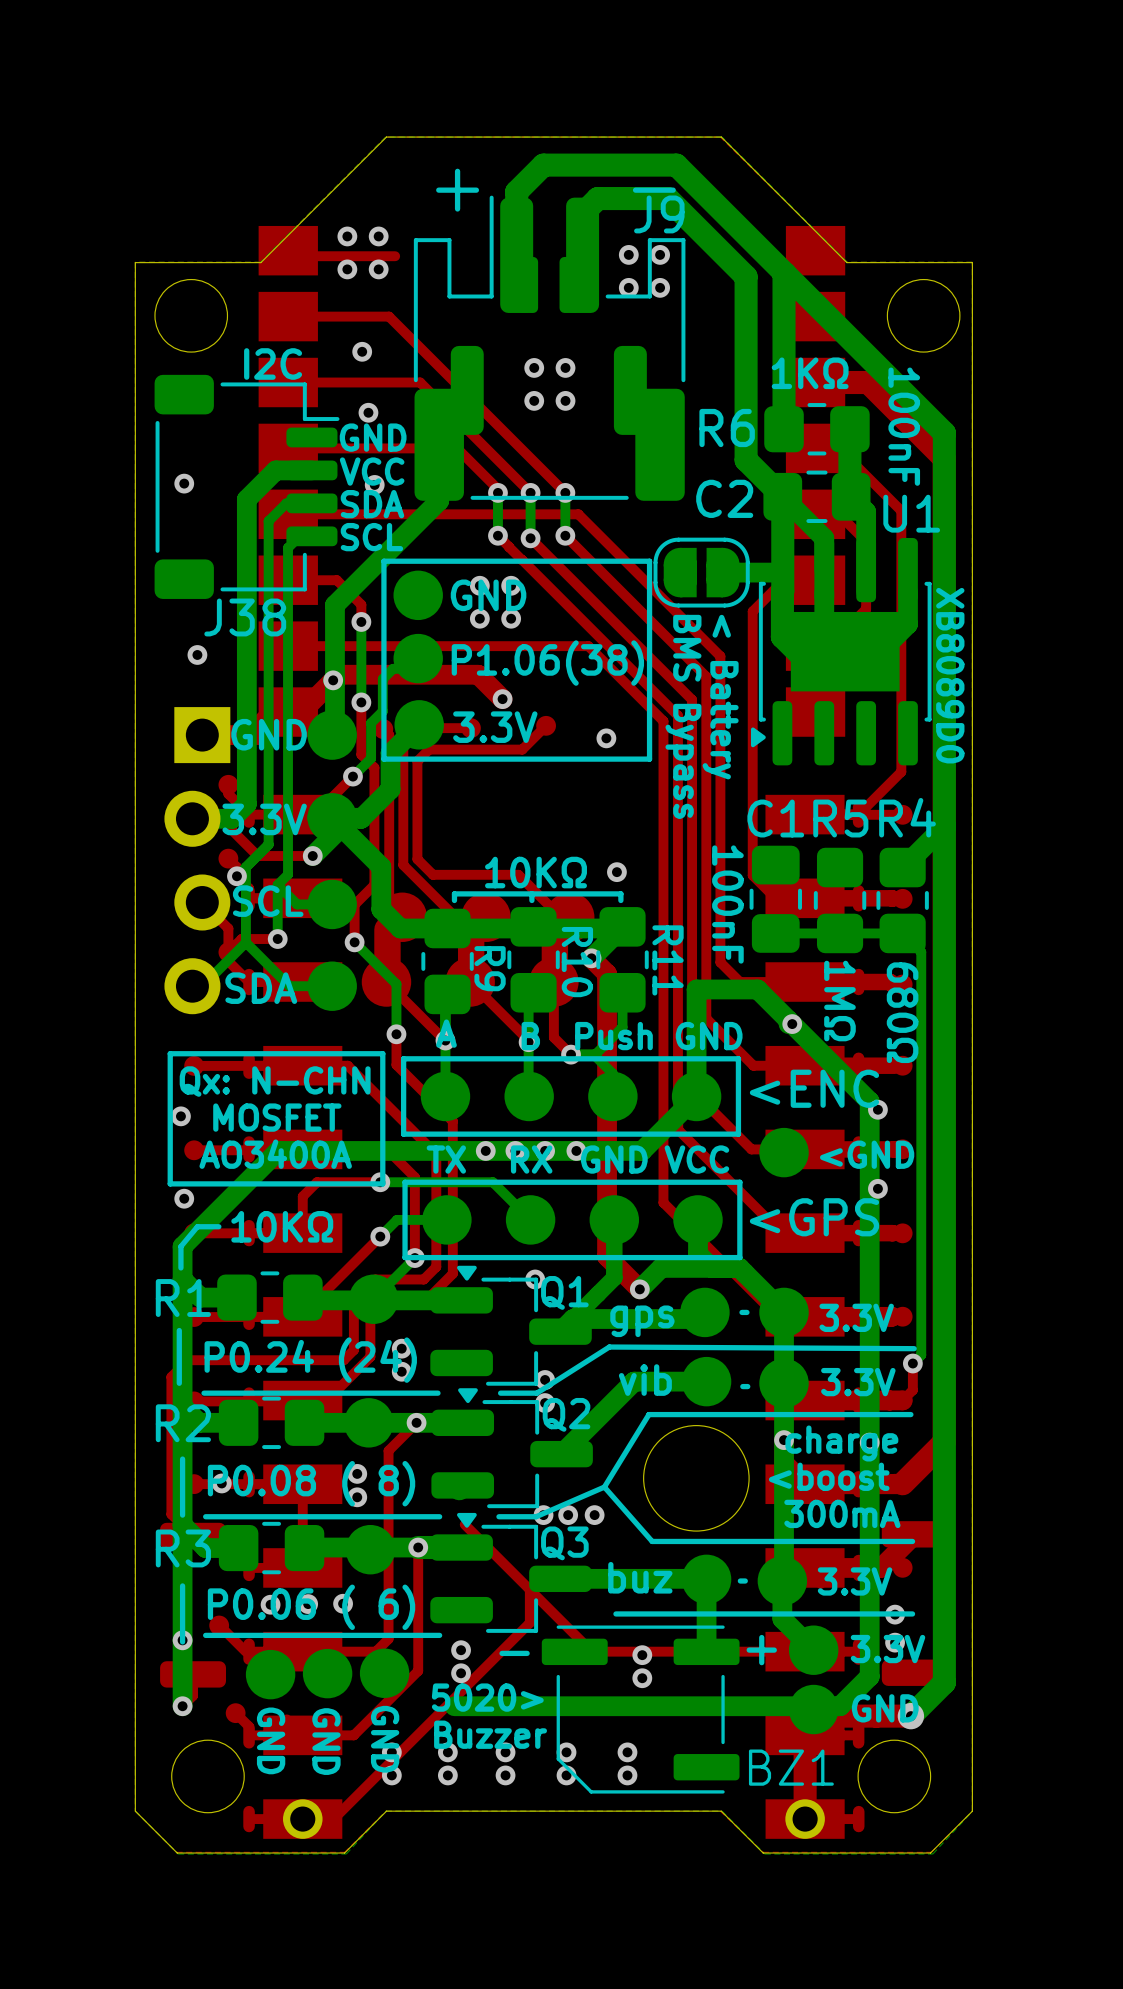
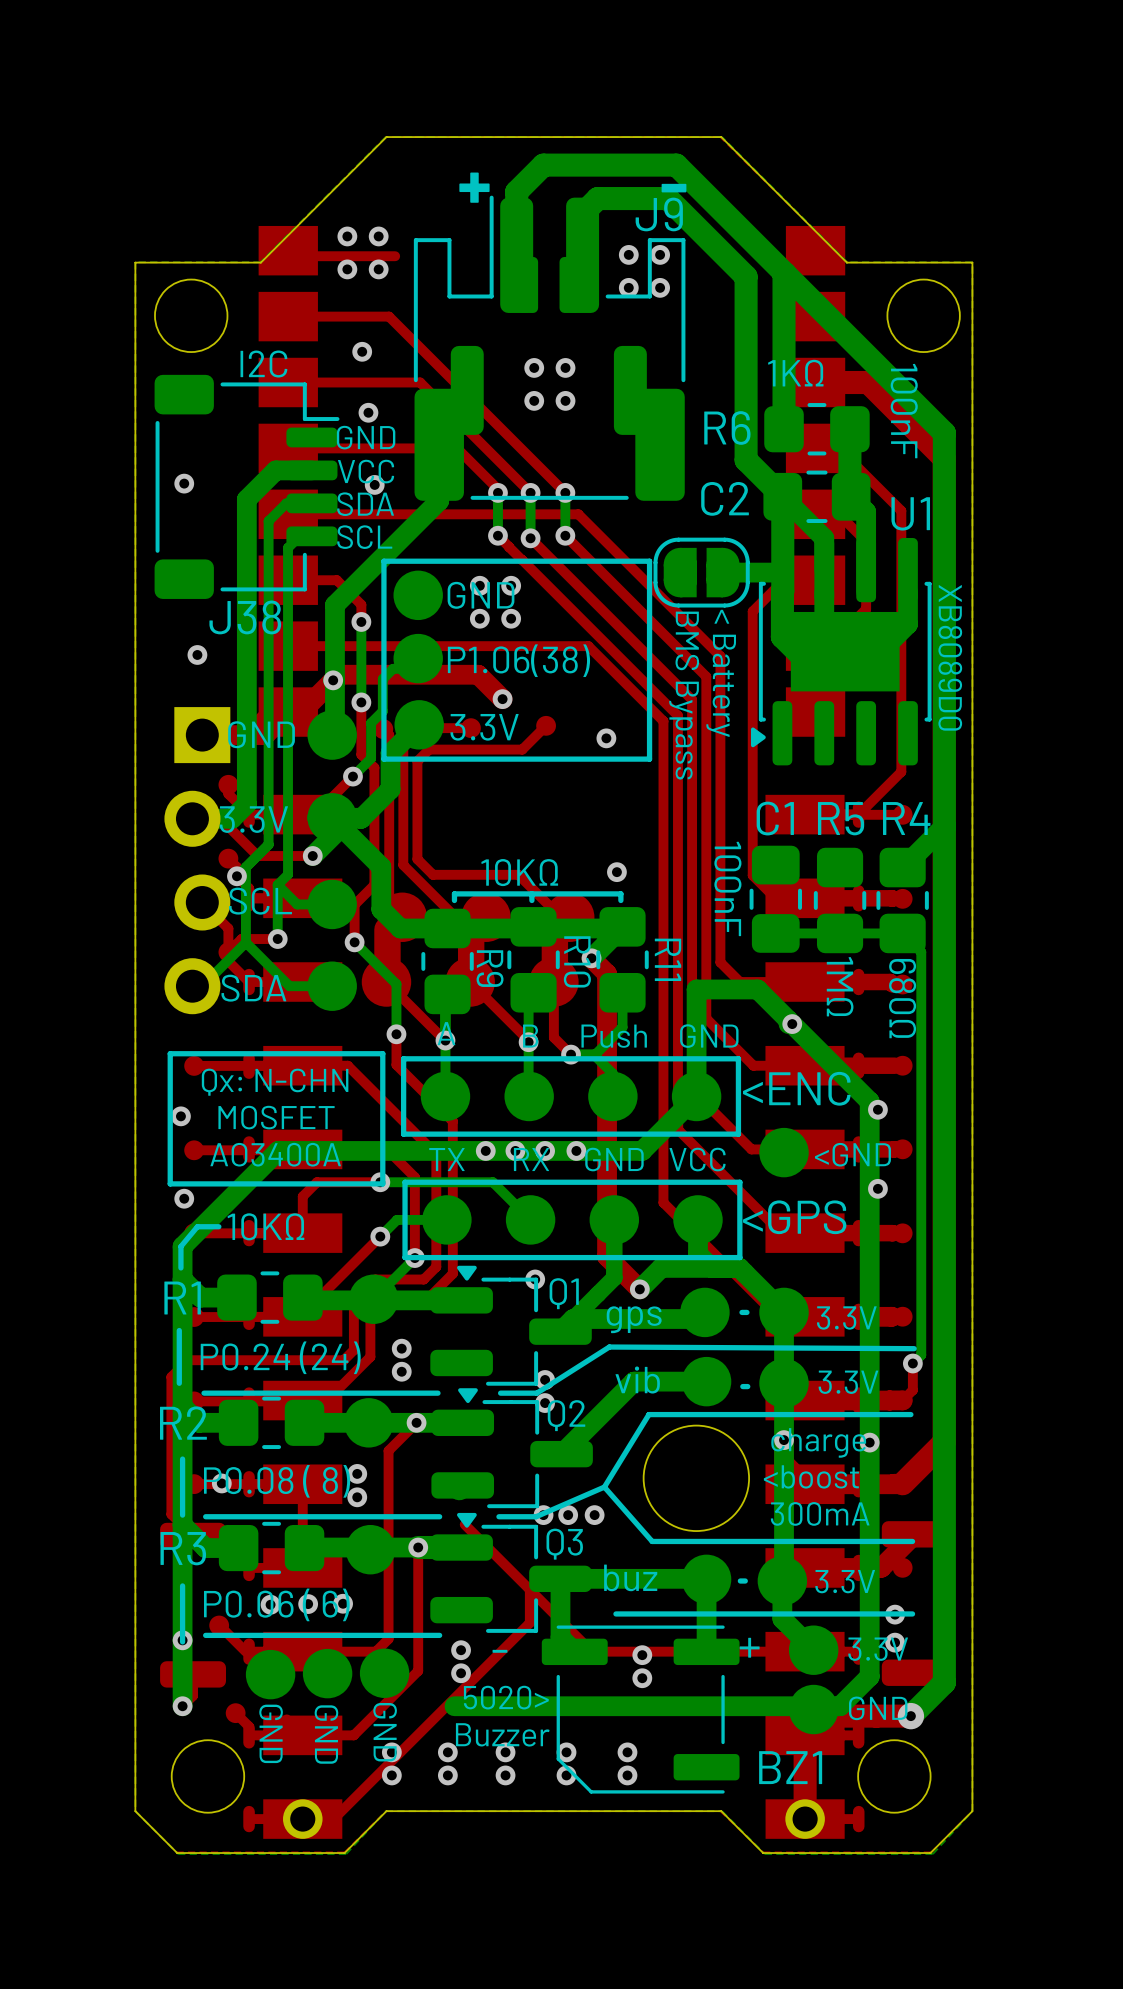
bottom track: none -> (560, 1578) (560, 1637) (574, 1651)

